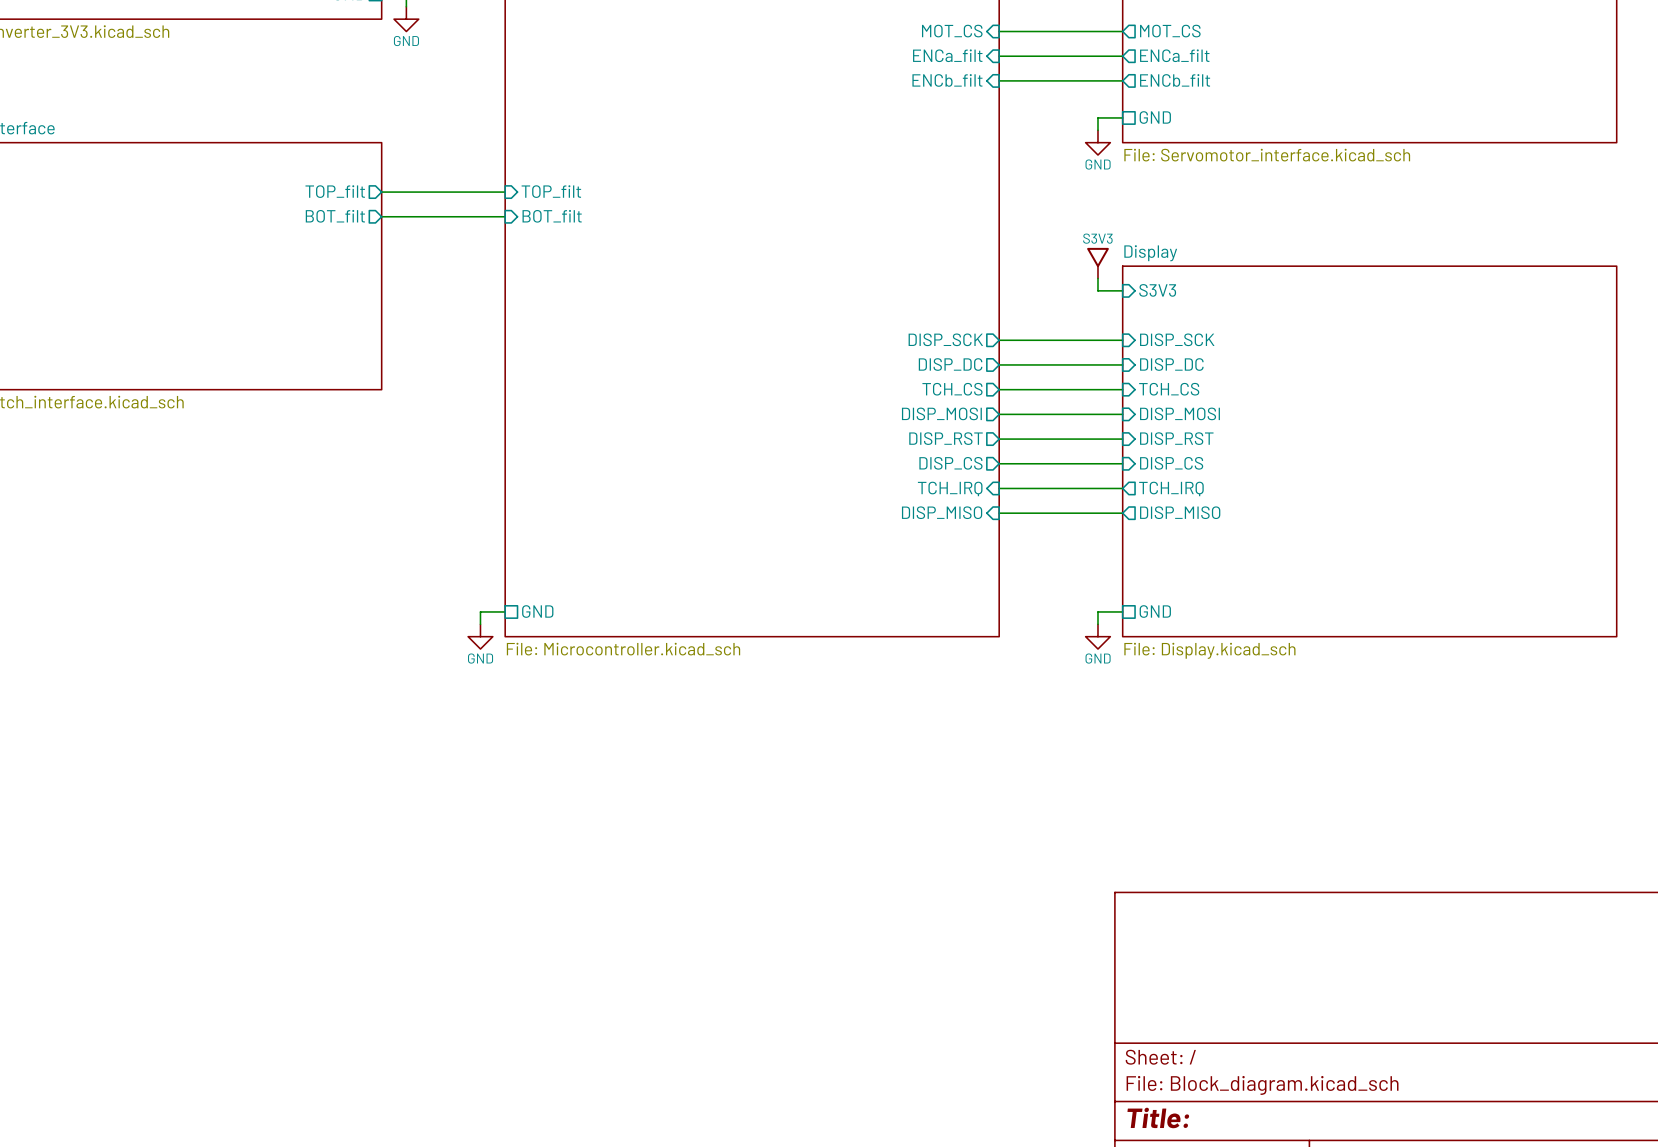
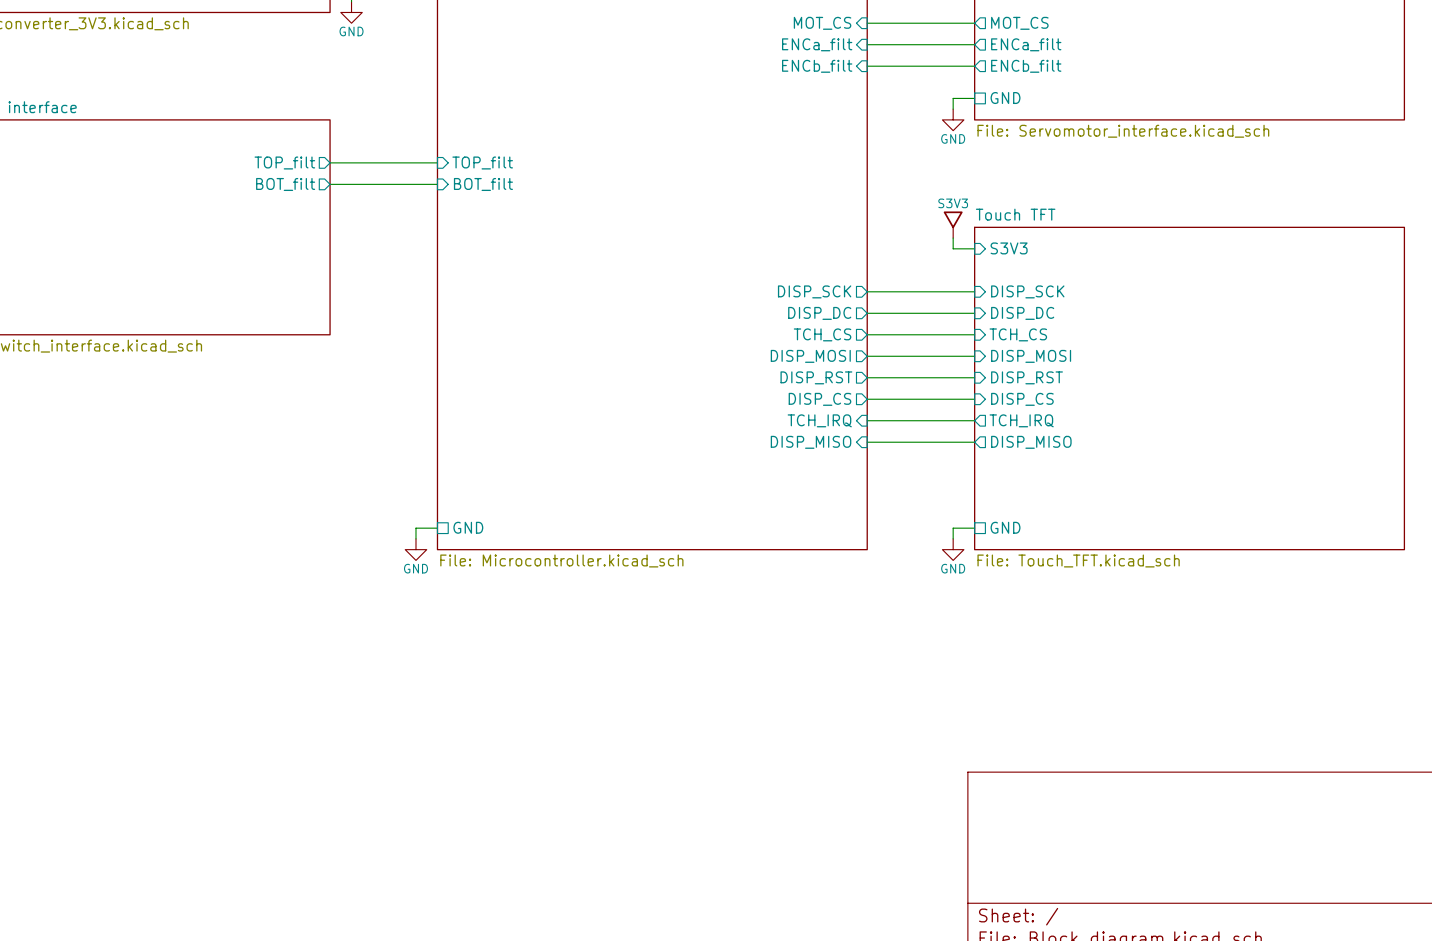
sheet Display name: Display (1150, 253) -> Touch TFT (1015, 214)
sheet Display value: File: Display.kicad_sch (1209, 650) -> File: Touch_TFT.kicad_sch (1078, 560)

